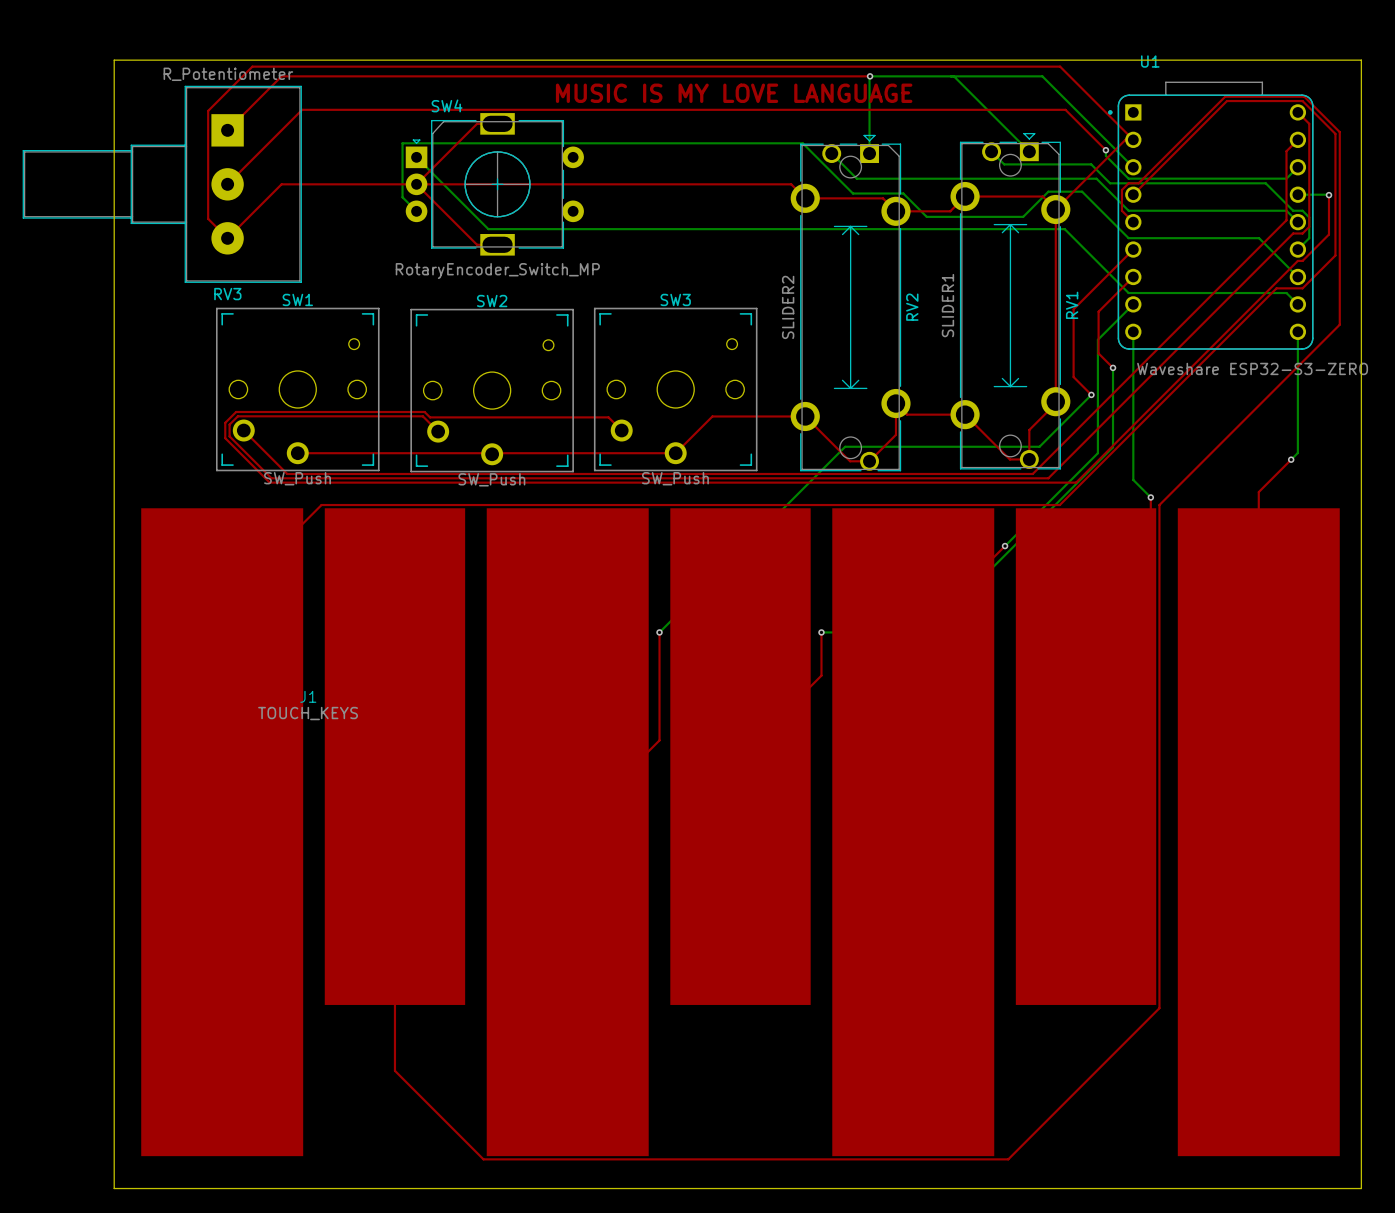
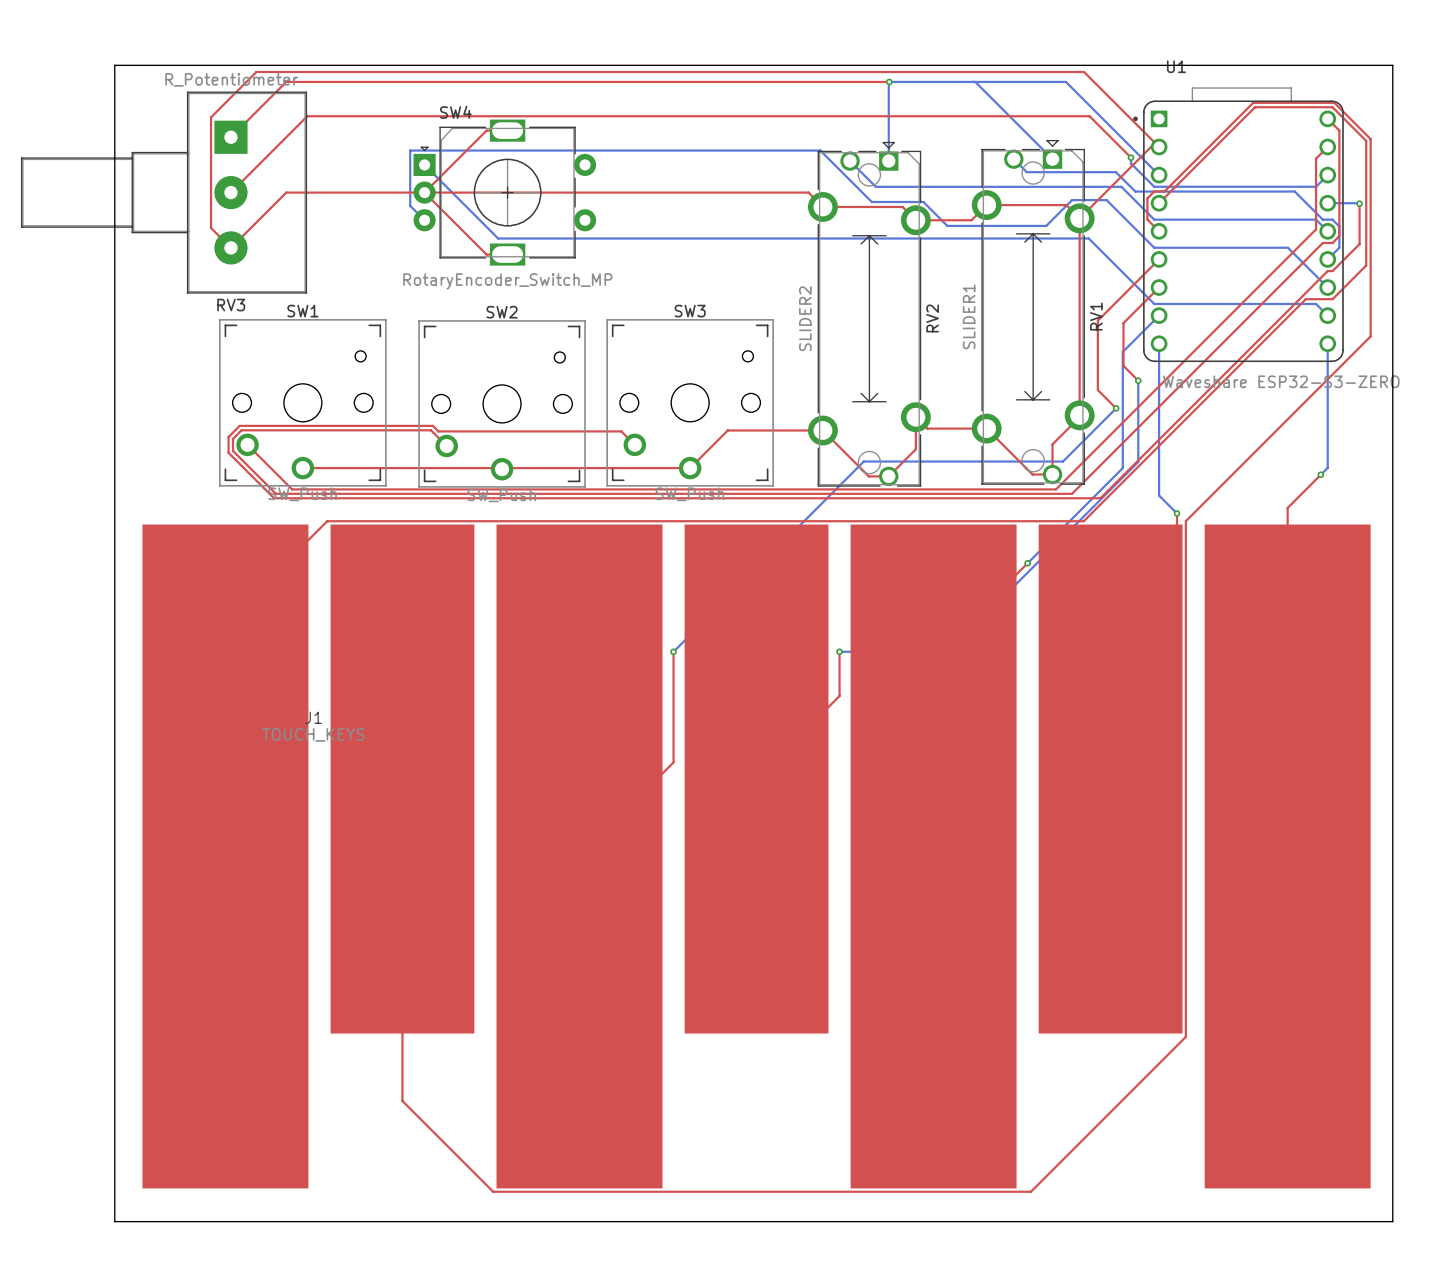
text: MUSIC IS MY LOVE LANGUAGE (734, 93) -> none

